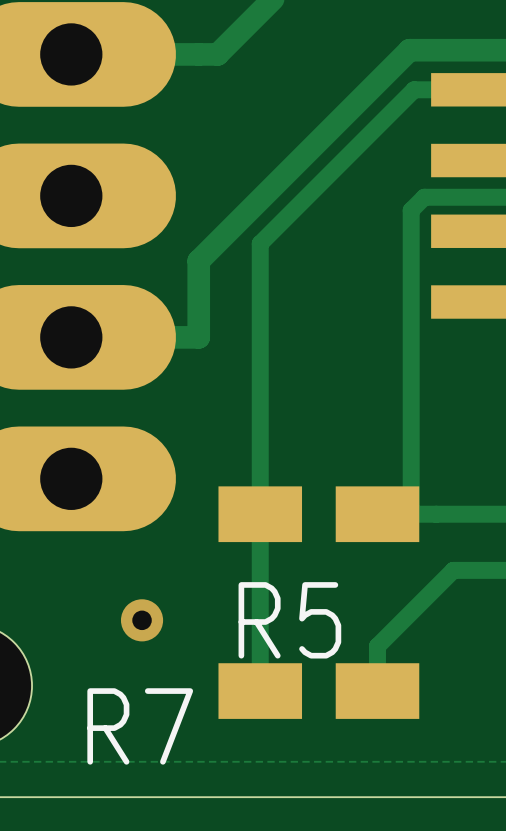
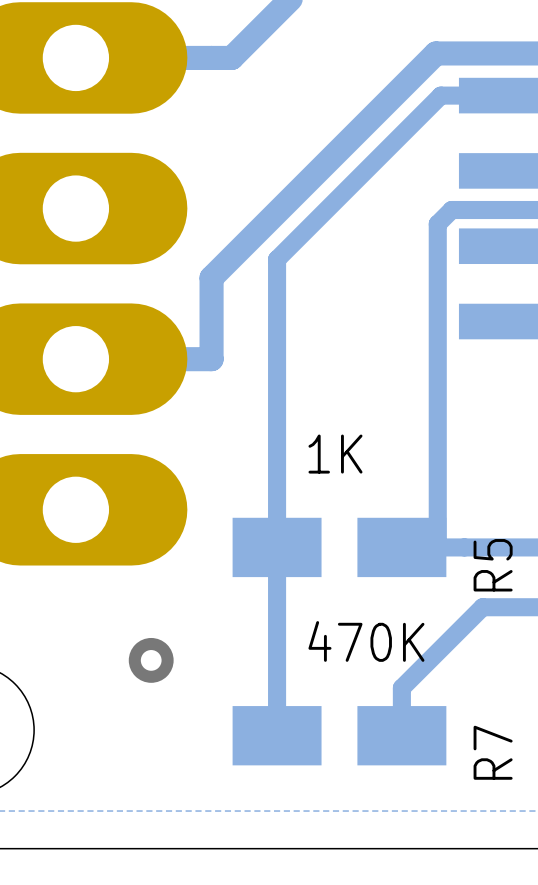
text: none -> 1K (335, 454)
text: none -> R5 (493, 565)
text: none -> 470K (366, 641)
R5 name: R5 (289, 620) -> none
text: none -> R7 (493, 752)
R7 name: R7 (140, 726) -> none

